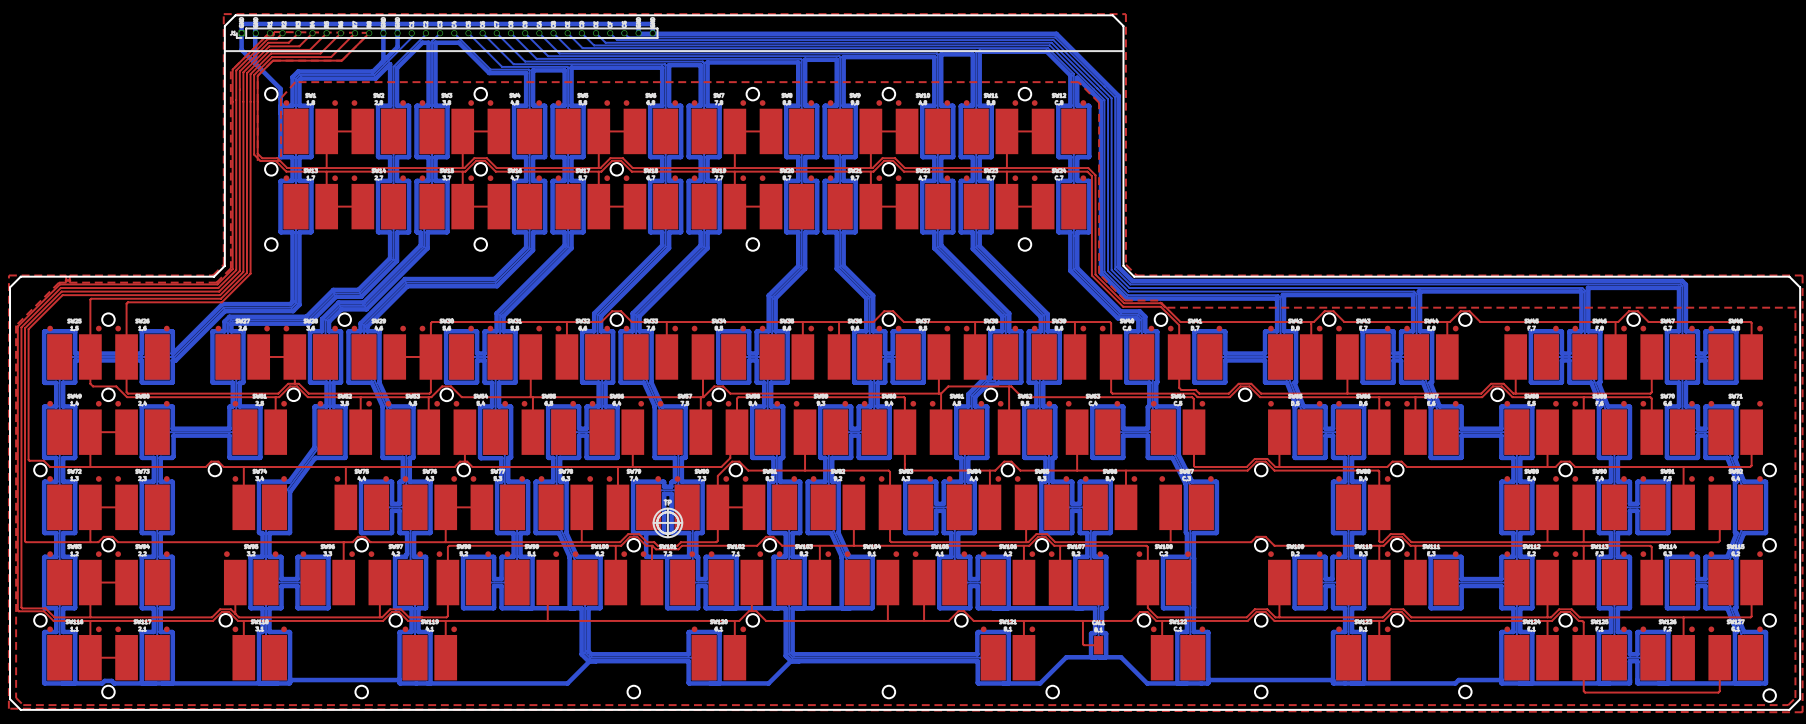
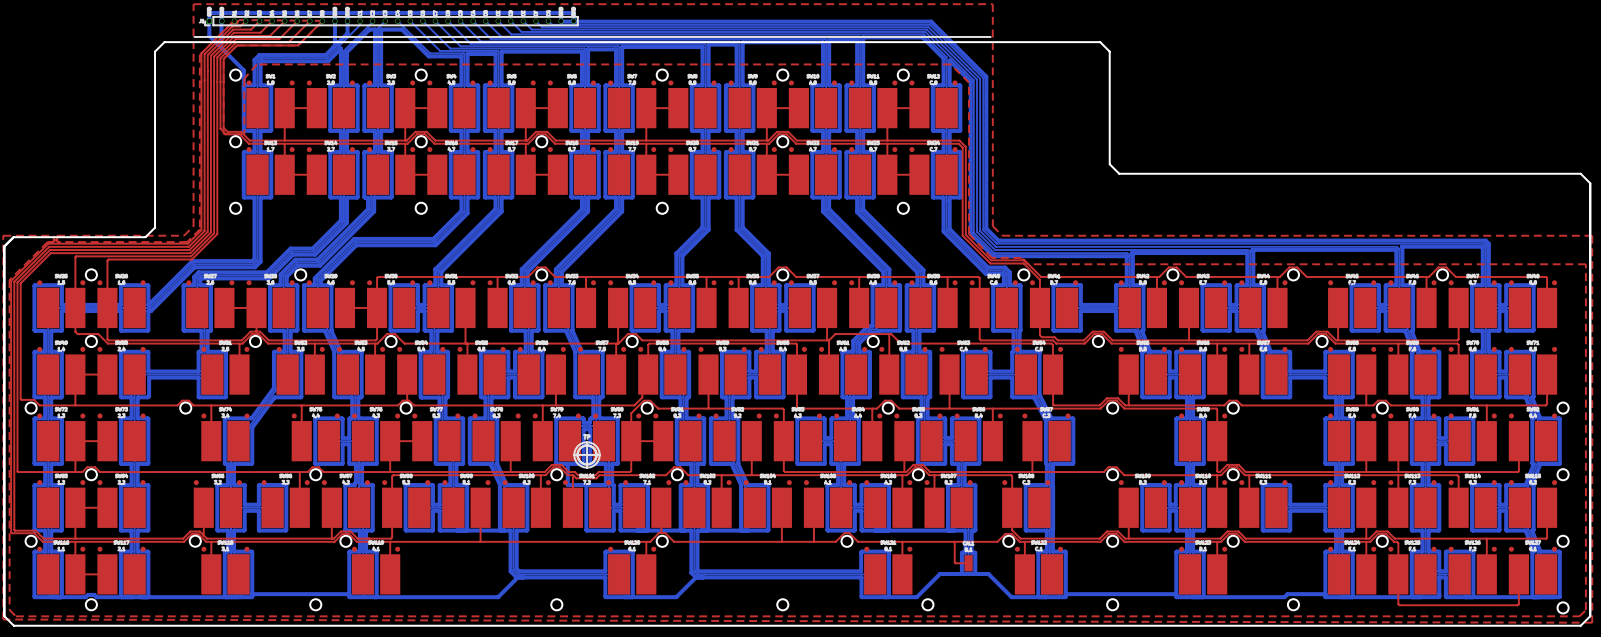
board edge: none -> (164, 42) (155, 51) (155, 227) (145, 237) (13, 237) (4, 246) (4, 616) (13, 625) (1580, 625) (1590, 616) (1590, 183) (1580, 173) (1119, 173) (1109, 164) (1109, 51) (1100, 42) (164, 42)
board edge: (20, 276) (214, 276) (224, 265) (224, 26) (235, 15) (1112, 15) (1123, 26) (1123, 265) (1134, 276) (1789, 276) (1800, 287) (1800, 699) (1789, 709) (20, 709) (10, 699) (10, 287) -> none

